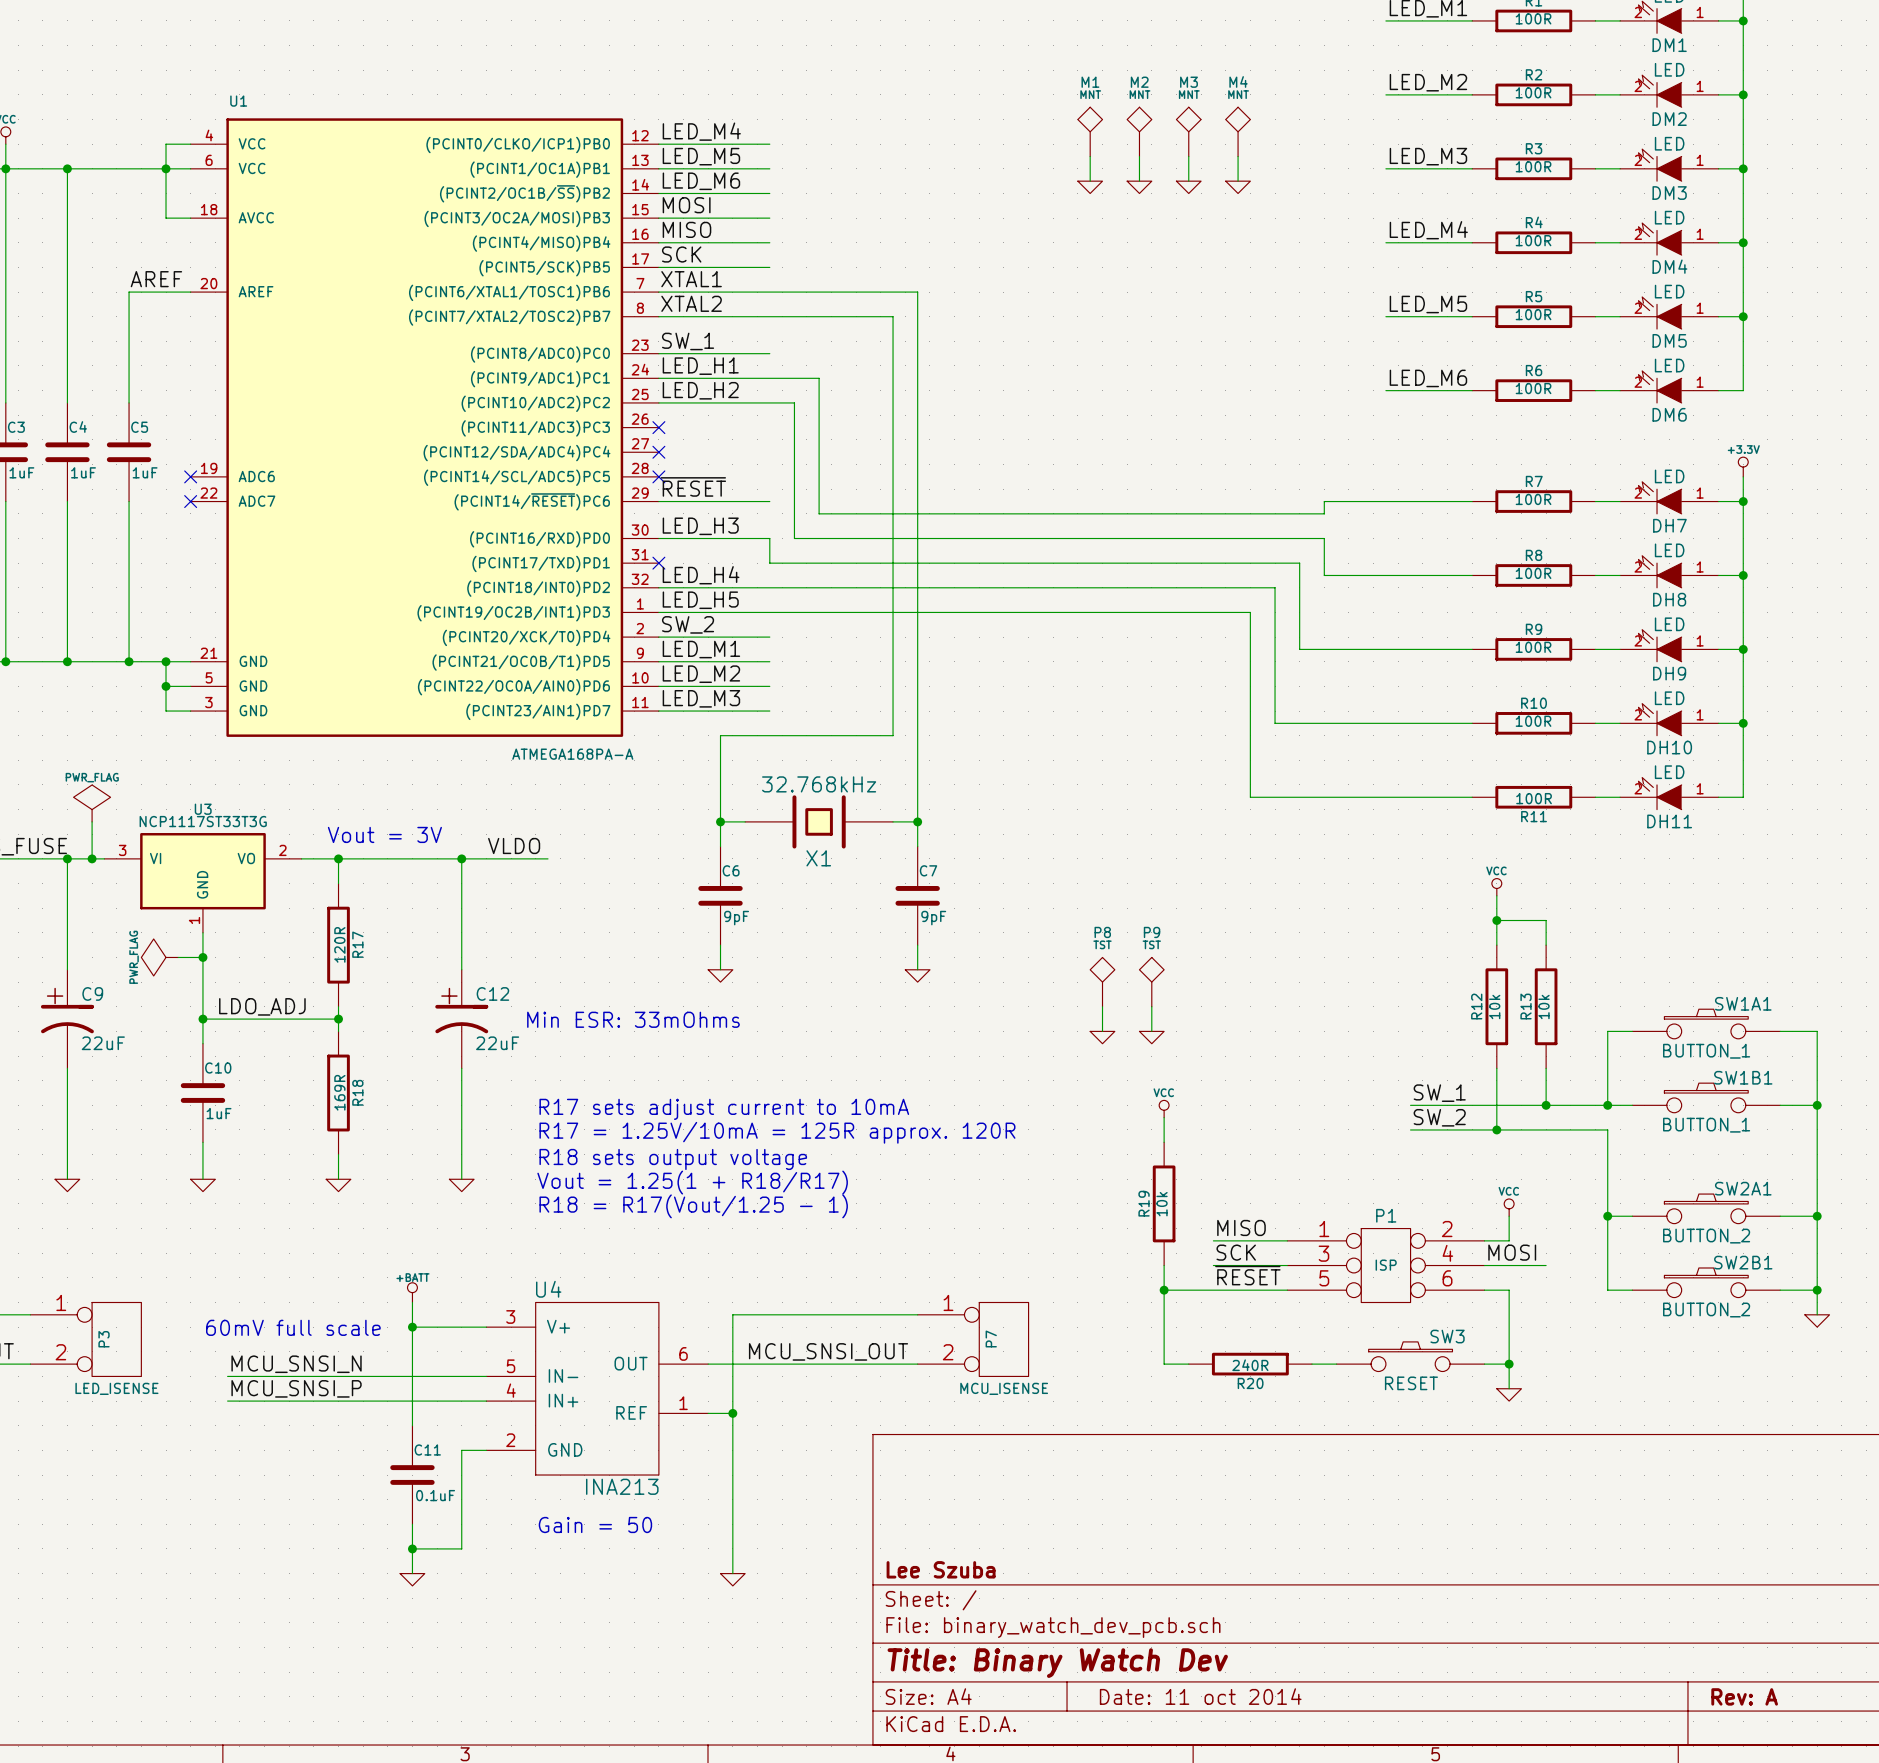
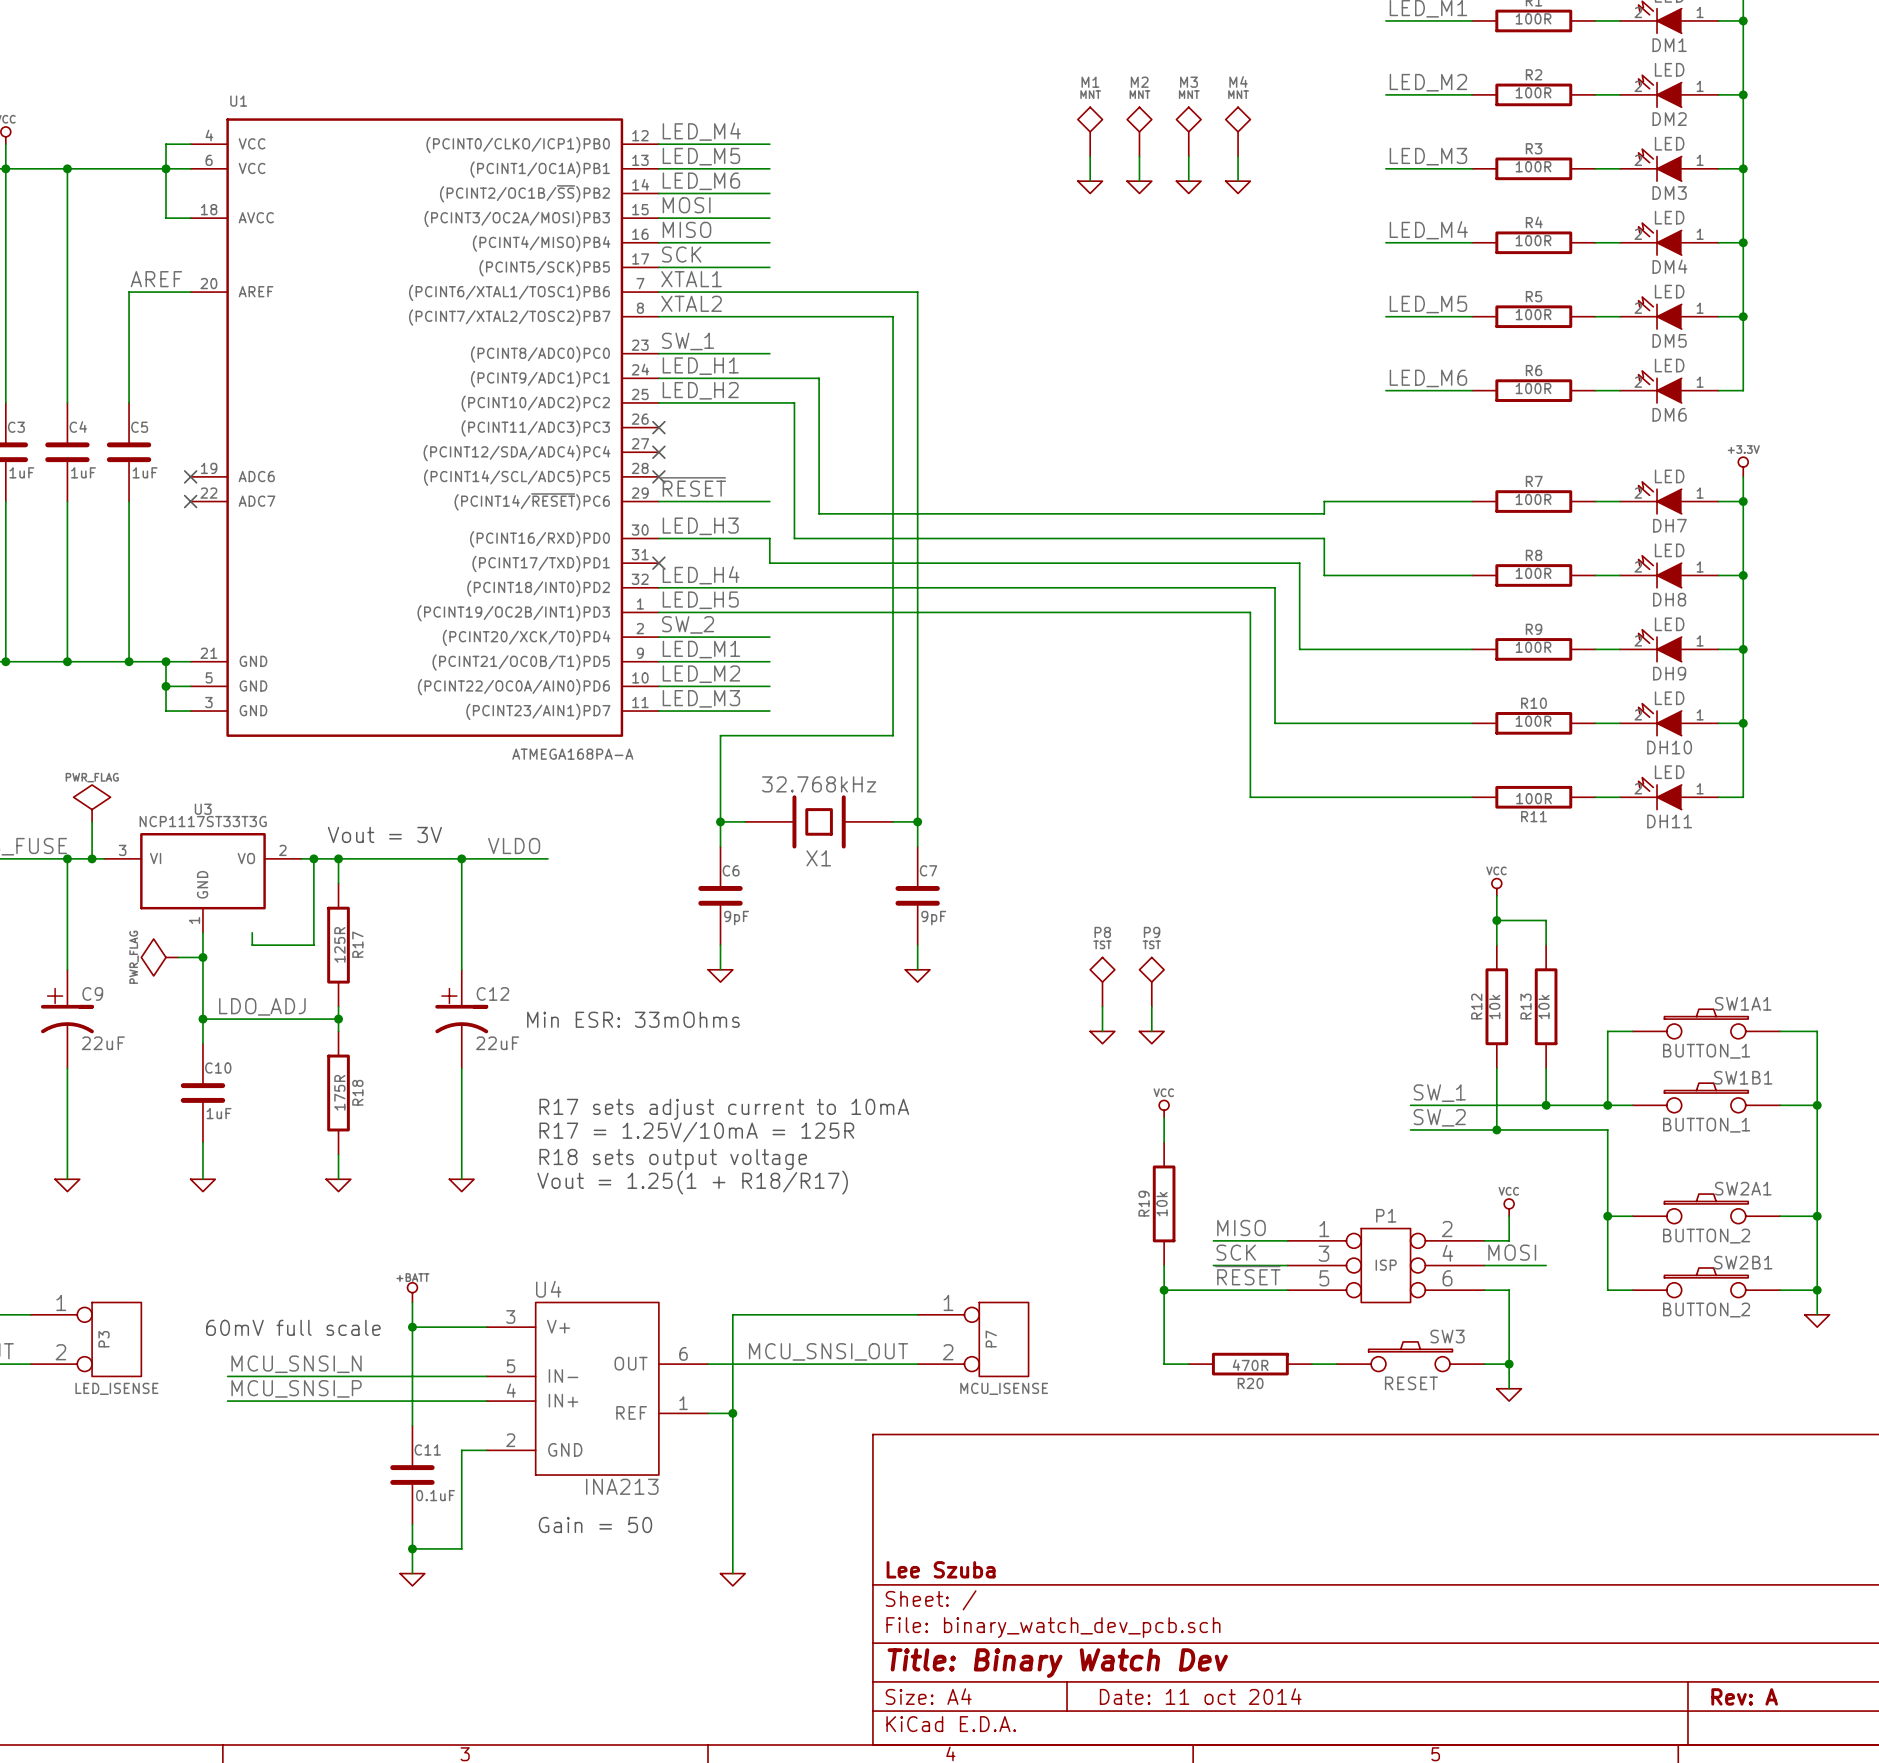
wire: none -> (313, 858) (313, 945) (252, 945) (252, 932)
junction: none -> (313, 858)
R17 value: 120R (339, 944) -> 125R (339, 944)
R18 value: 169R (339, 1092) -> 175R (339, 1092)
text: R17 = 1.25V/10mA = 125R approx. 120R (777, 1132) -> R17 = 1.25V/10mA = 125R (696, 1132)
text: R18 = R17(Vout/1.25 - 1) (693, 1206) -> none
R20 value: 240R (1250, 1365) -> 470R (1250, 1365)

